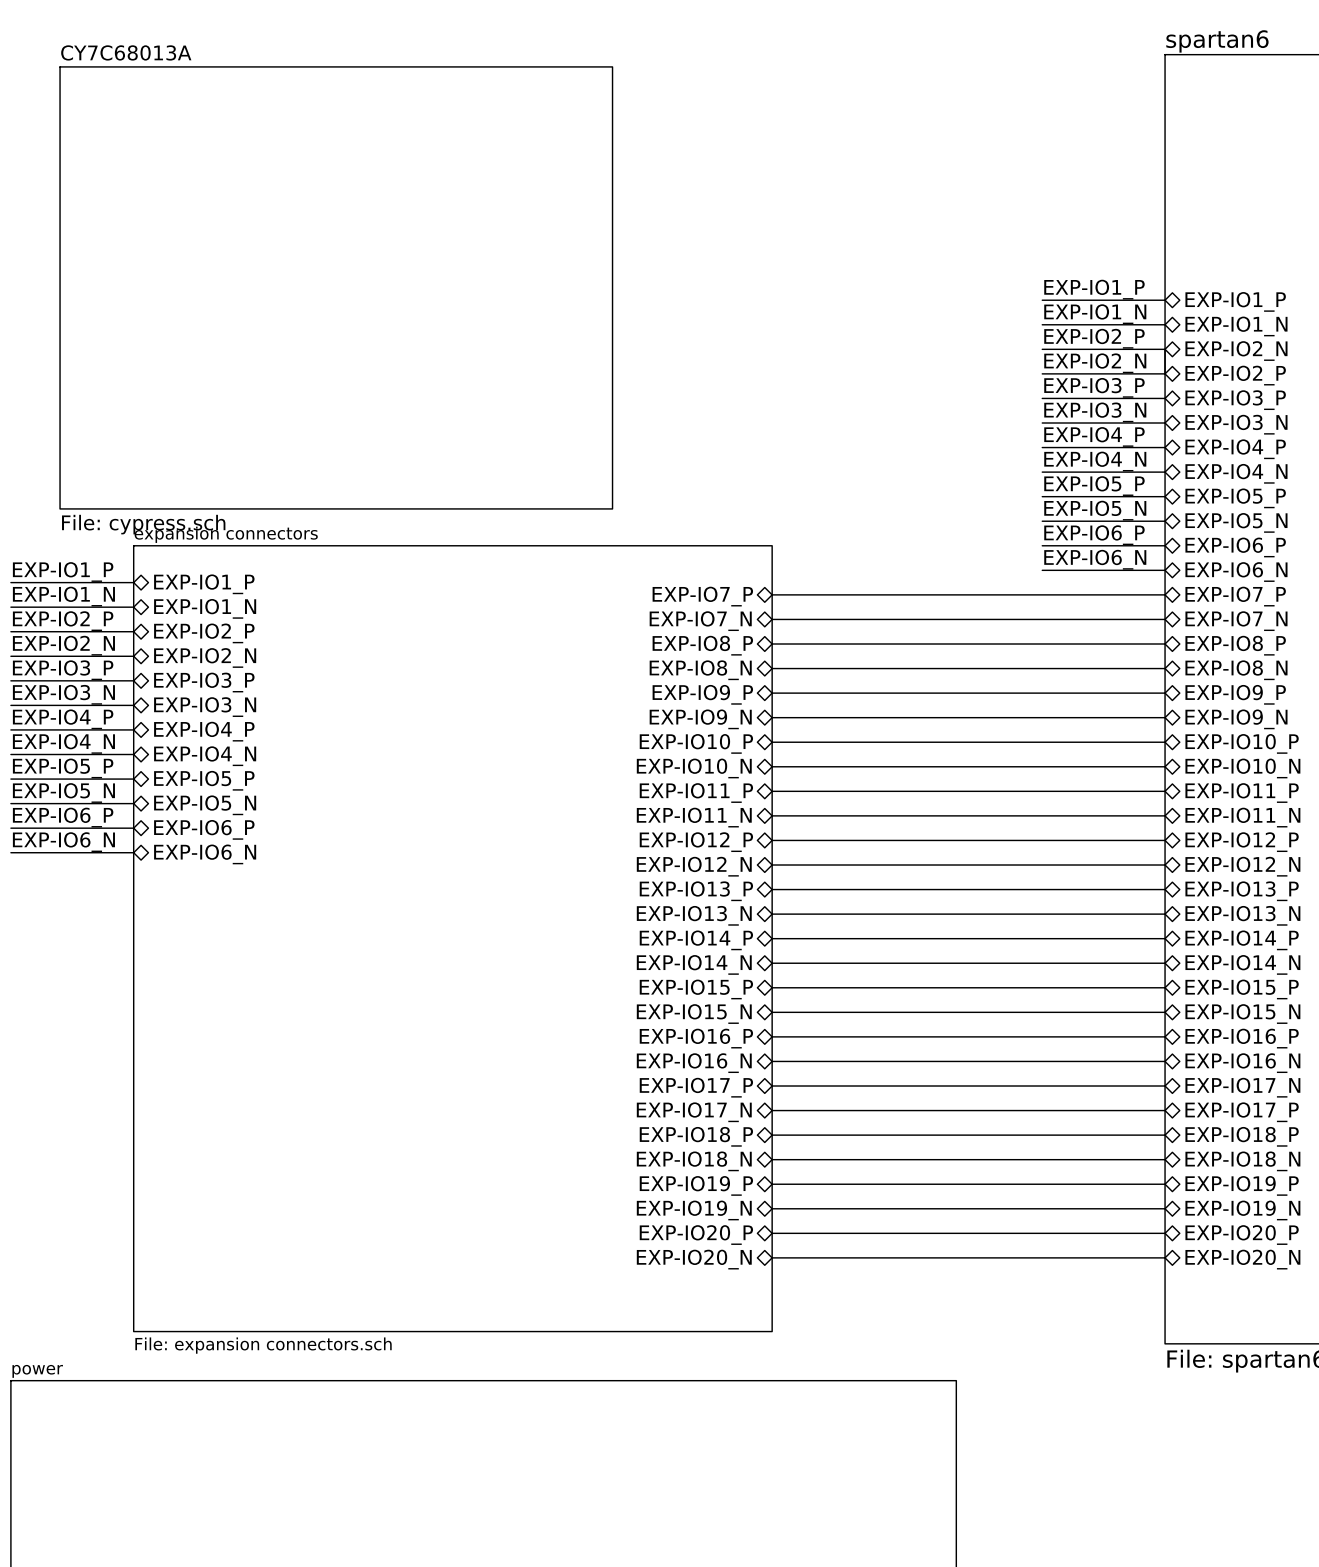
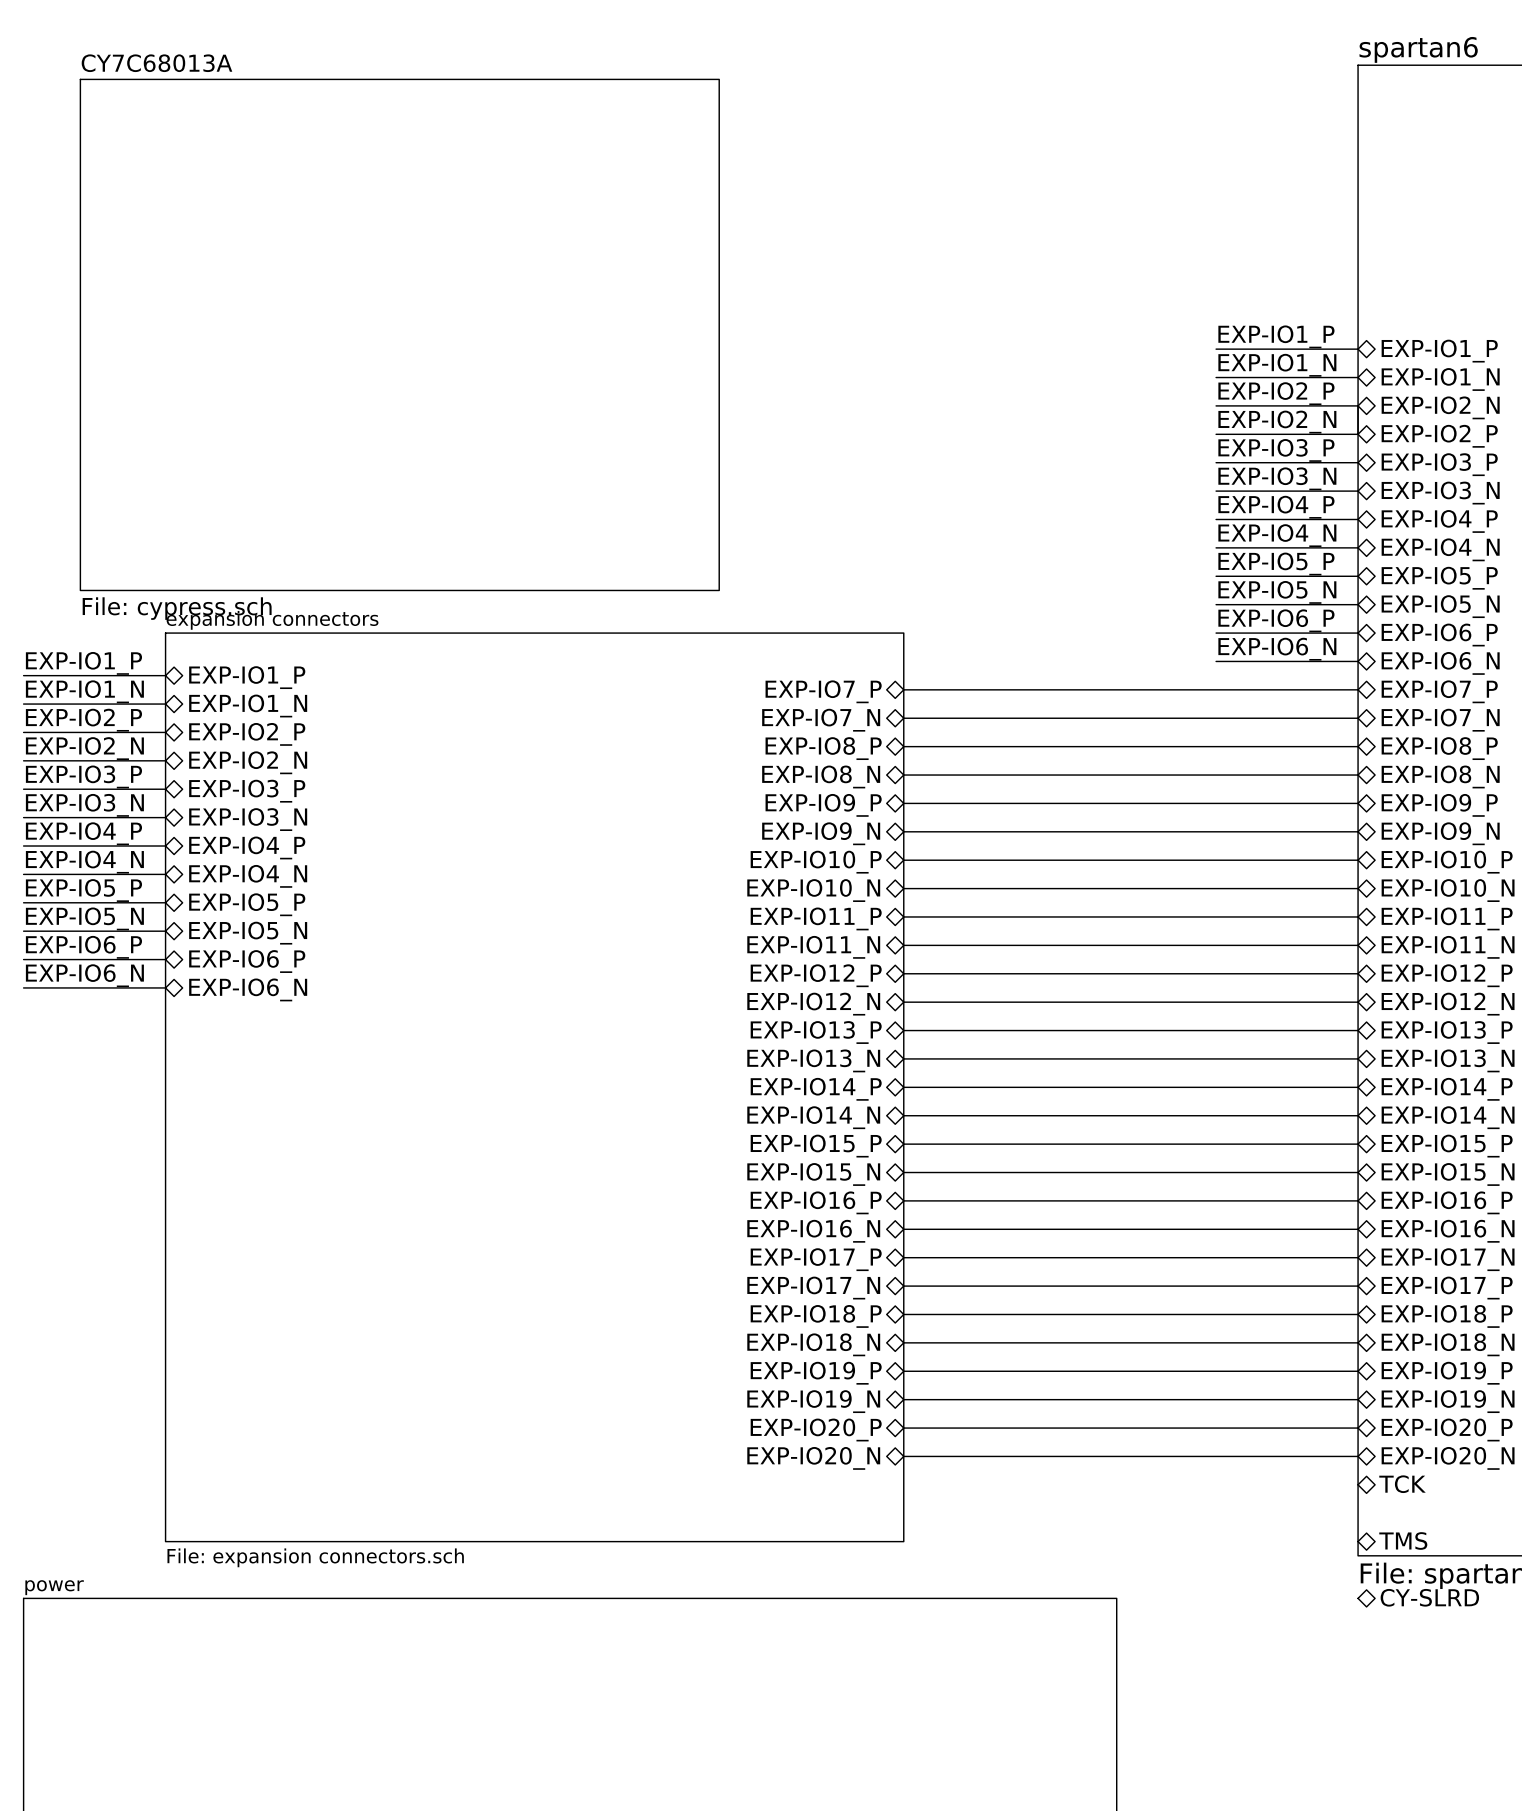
sheet pin: none -> TCK (1402, 1484)
sheet pin: none -> TMS (1403, 1540)
sheet pin: none -> CY-SLRD (1429, 1597)

